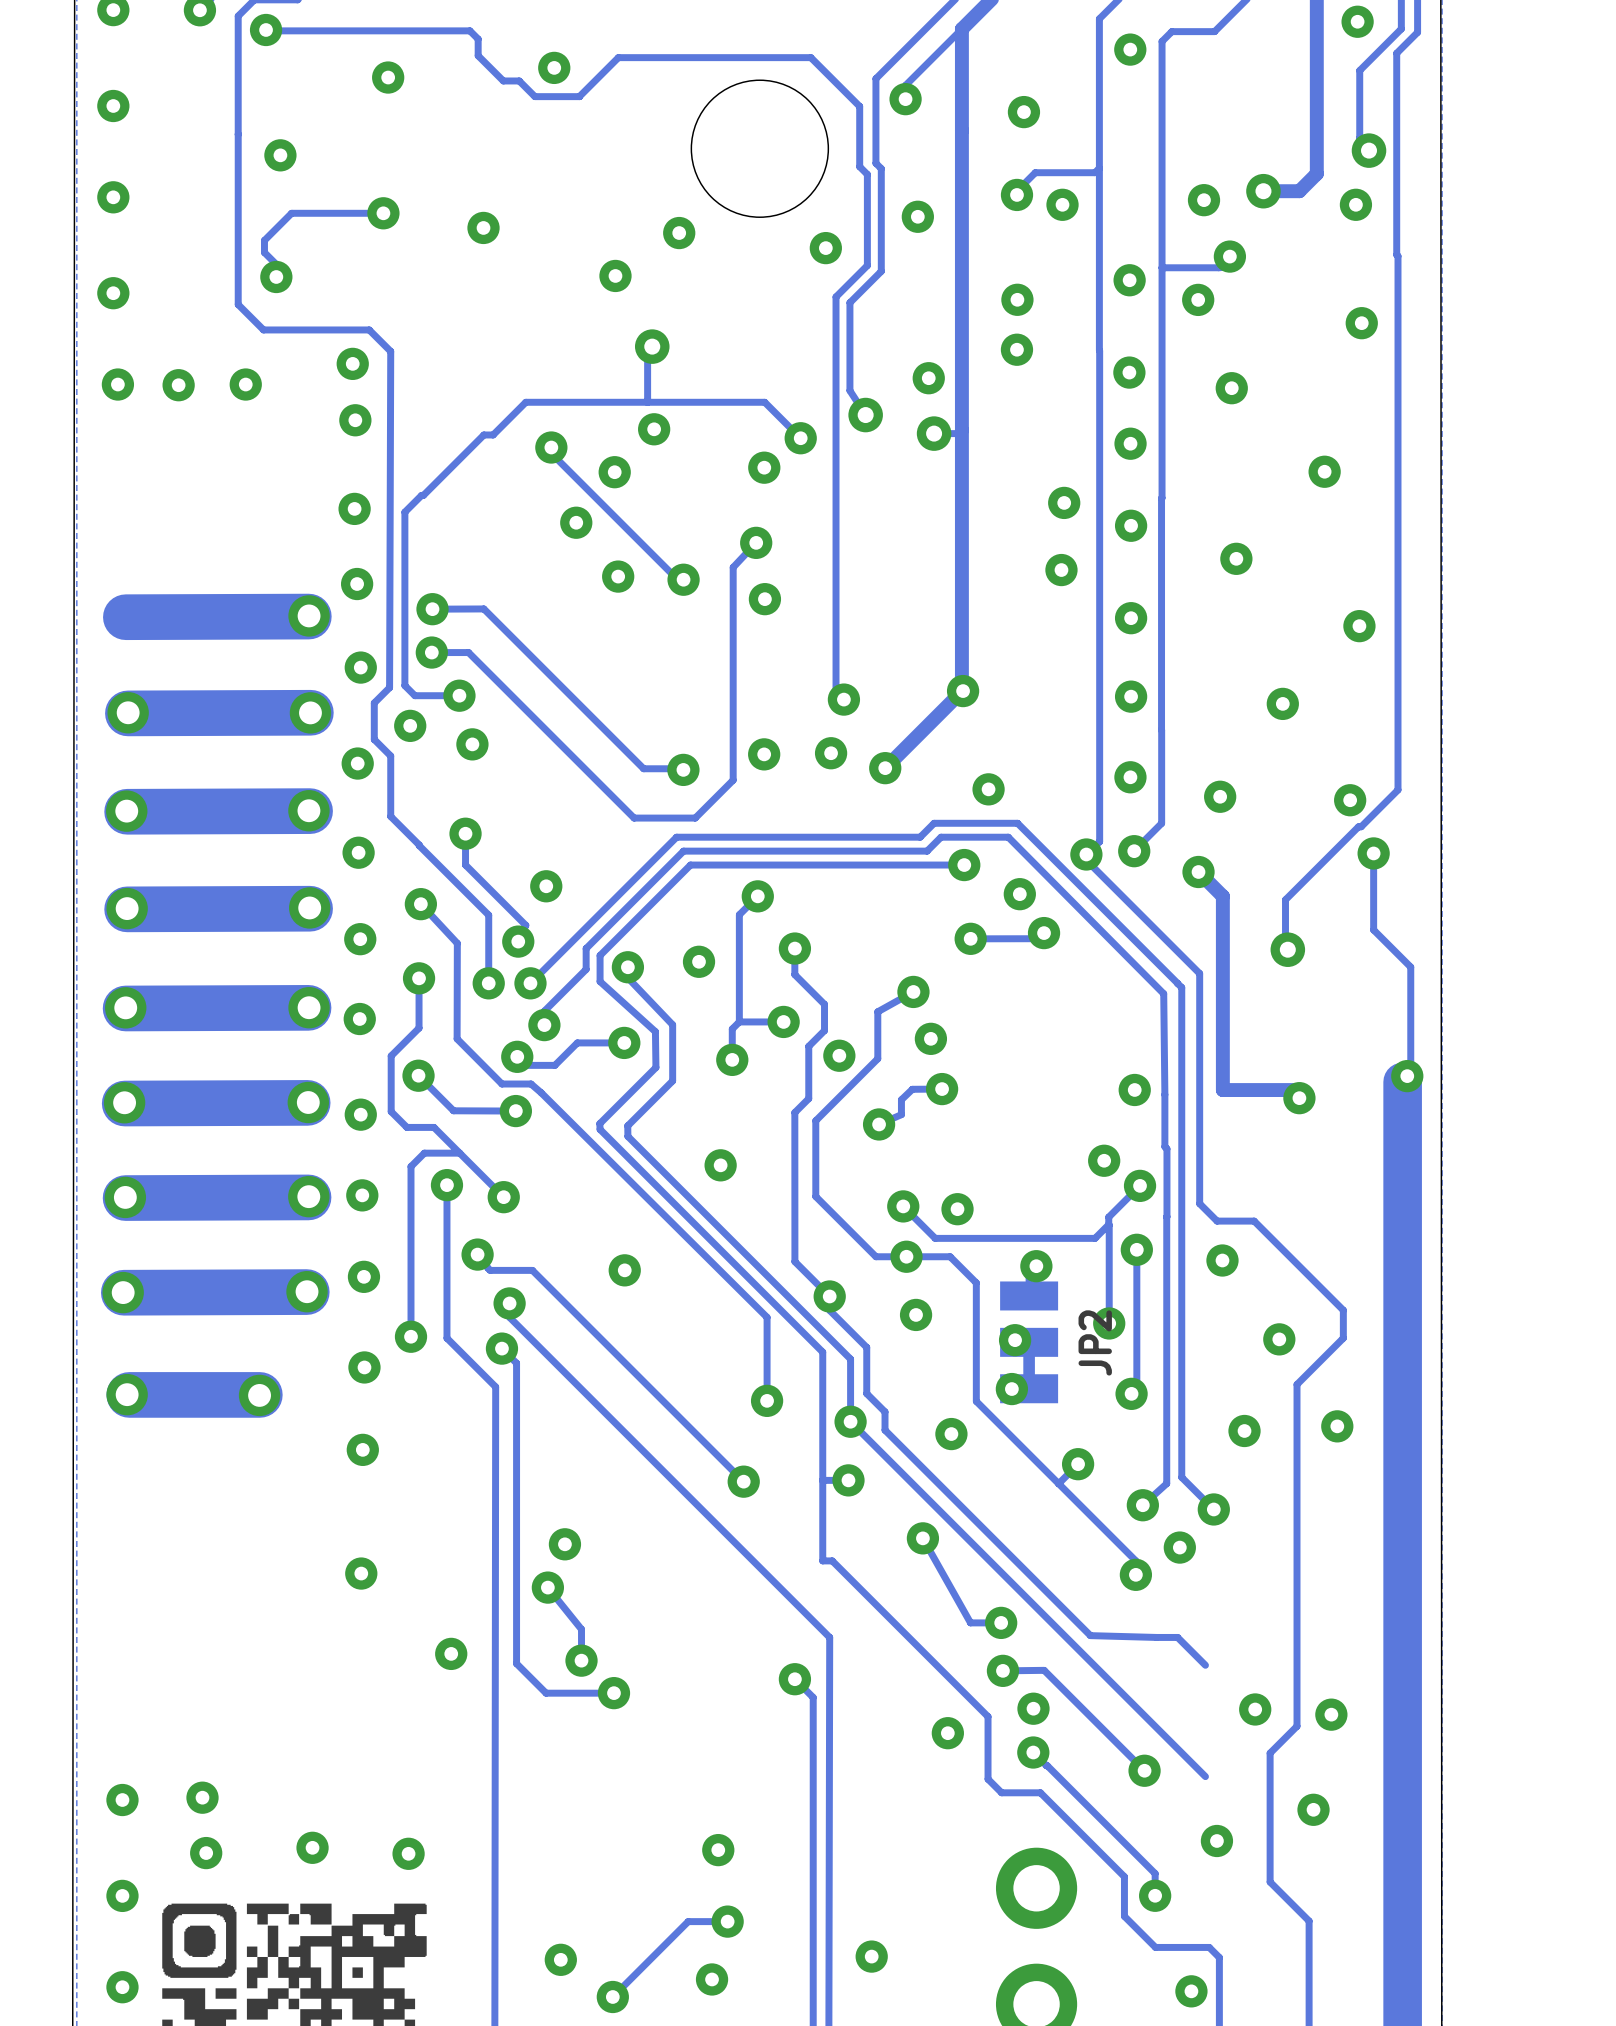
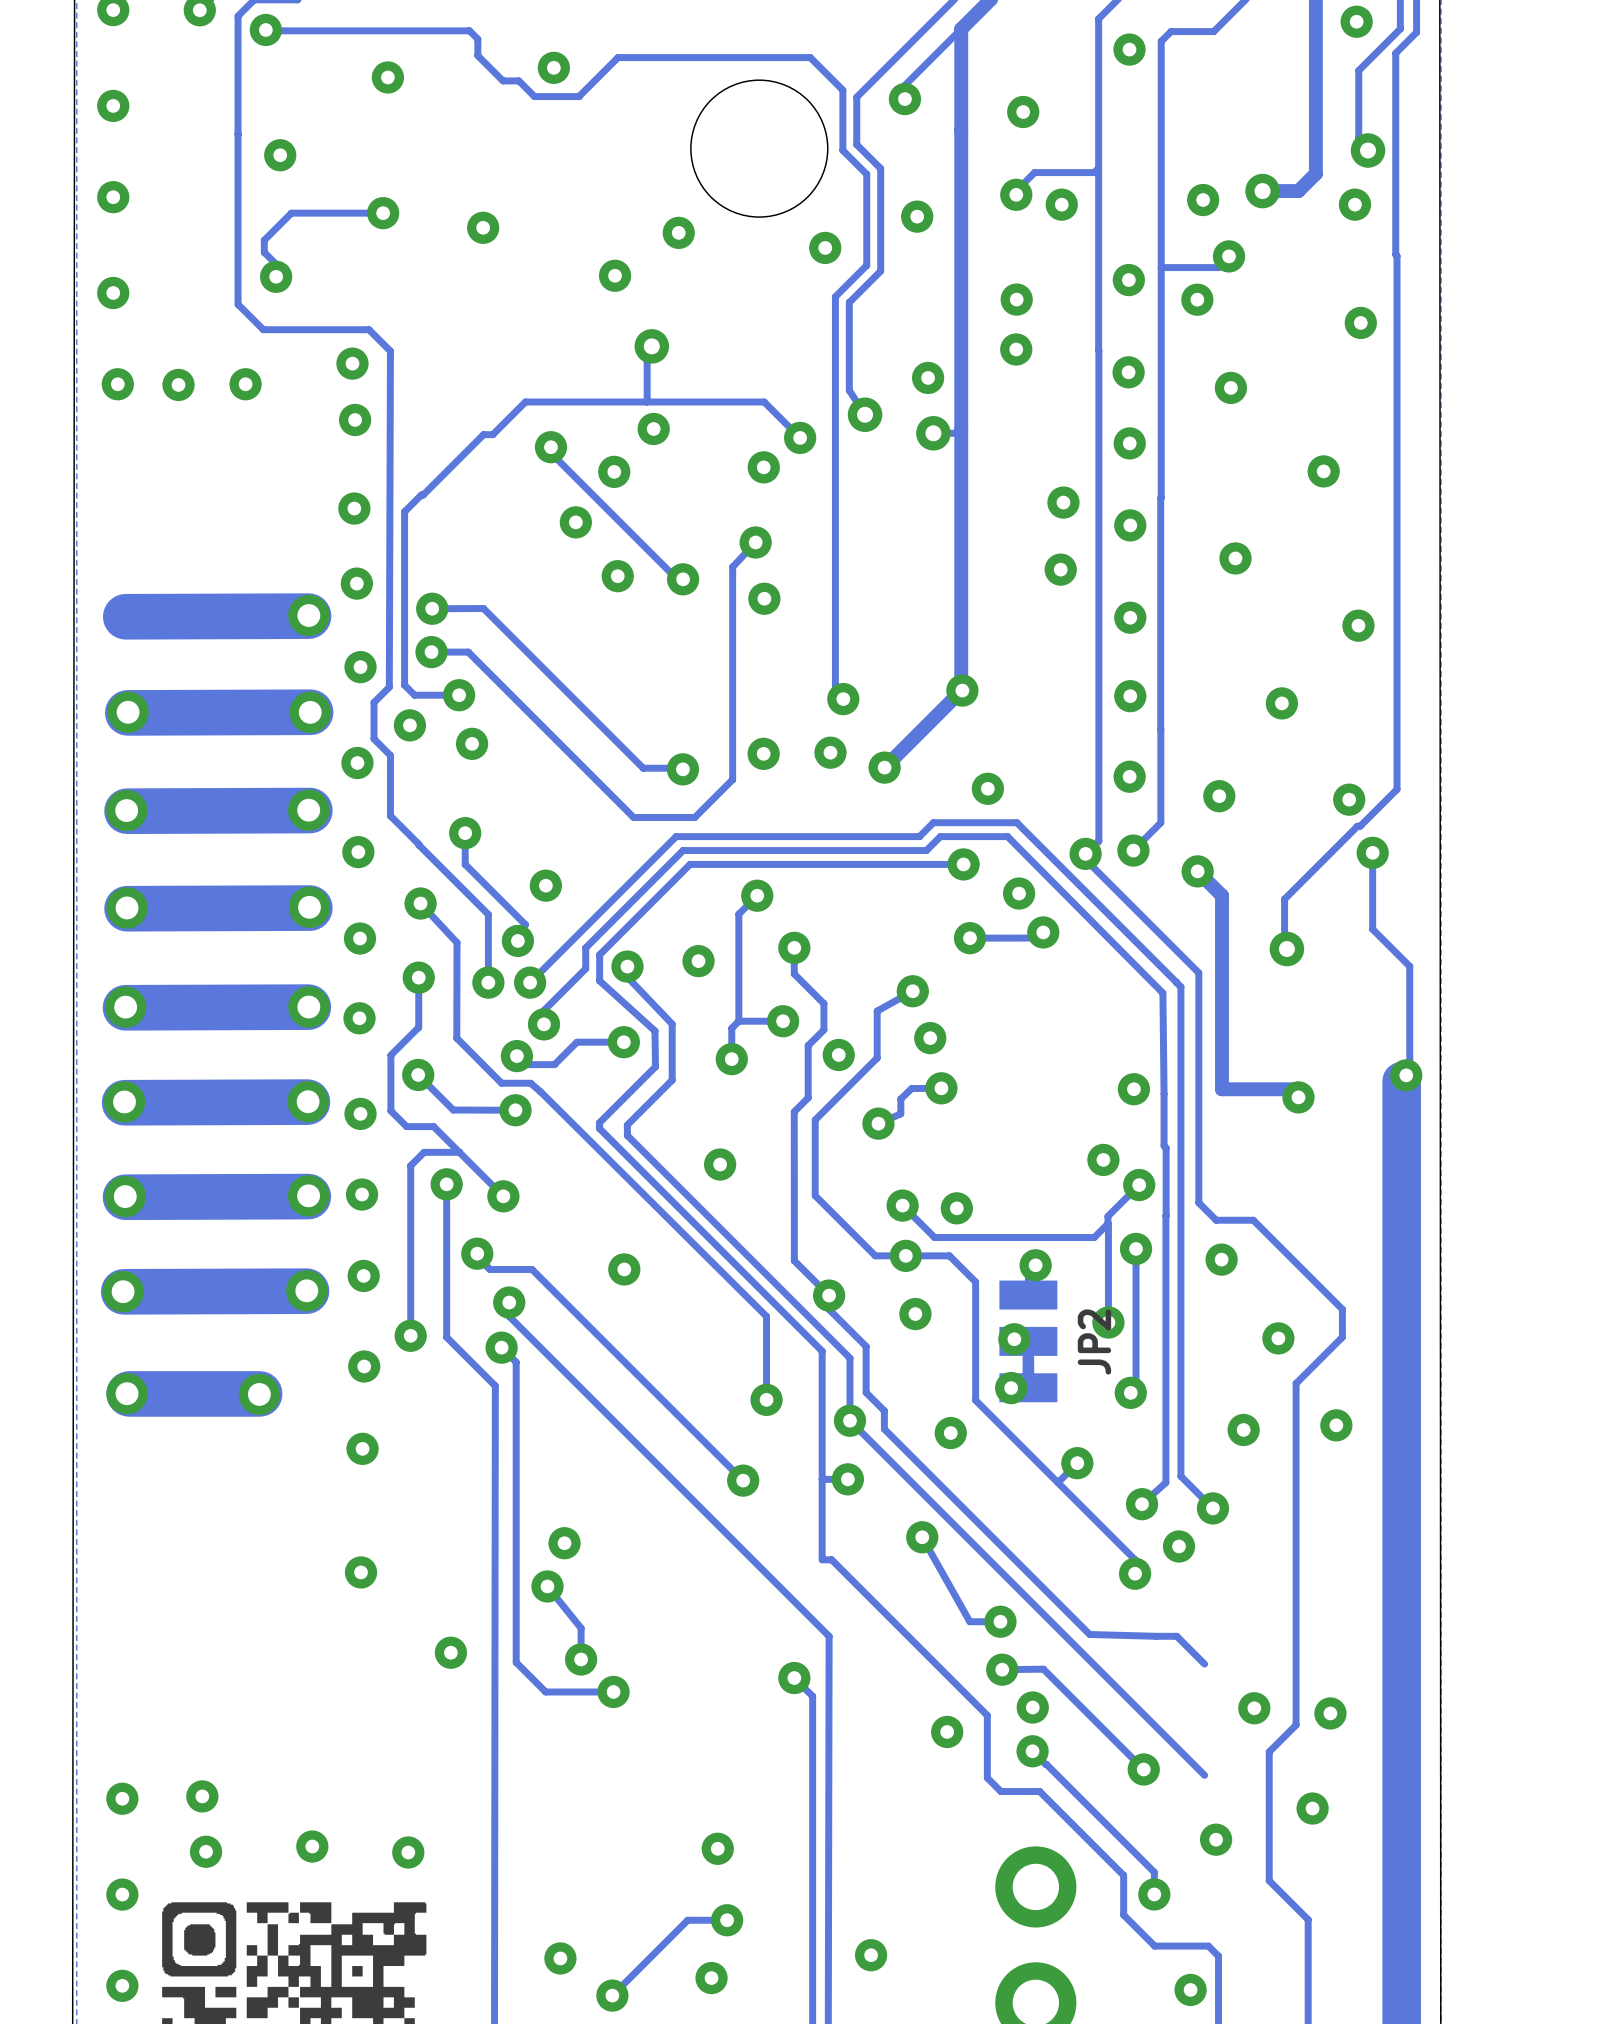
track: (875, 78) (875, 163) -> (875, 78) (856, 97) (856, 144) (875, 163)
track: (843, 90) (859, 106) (859, 166) -> (842, 90) (842, 150) (859, 166)

